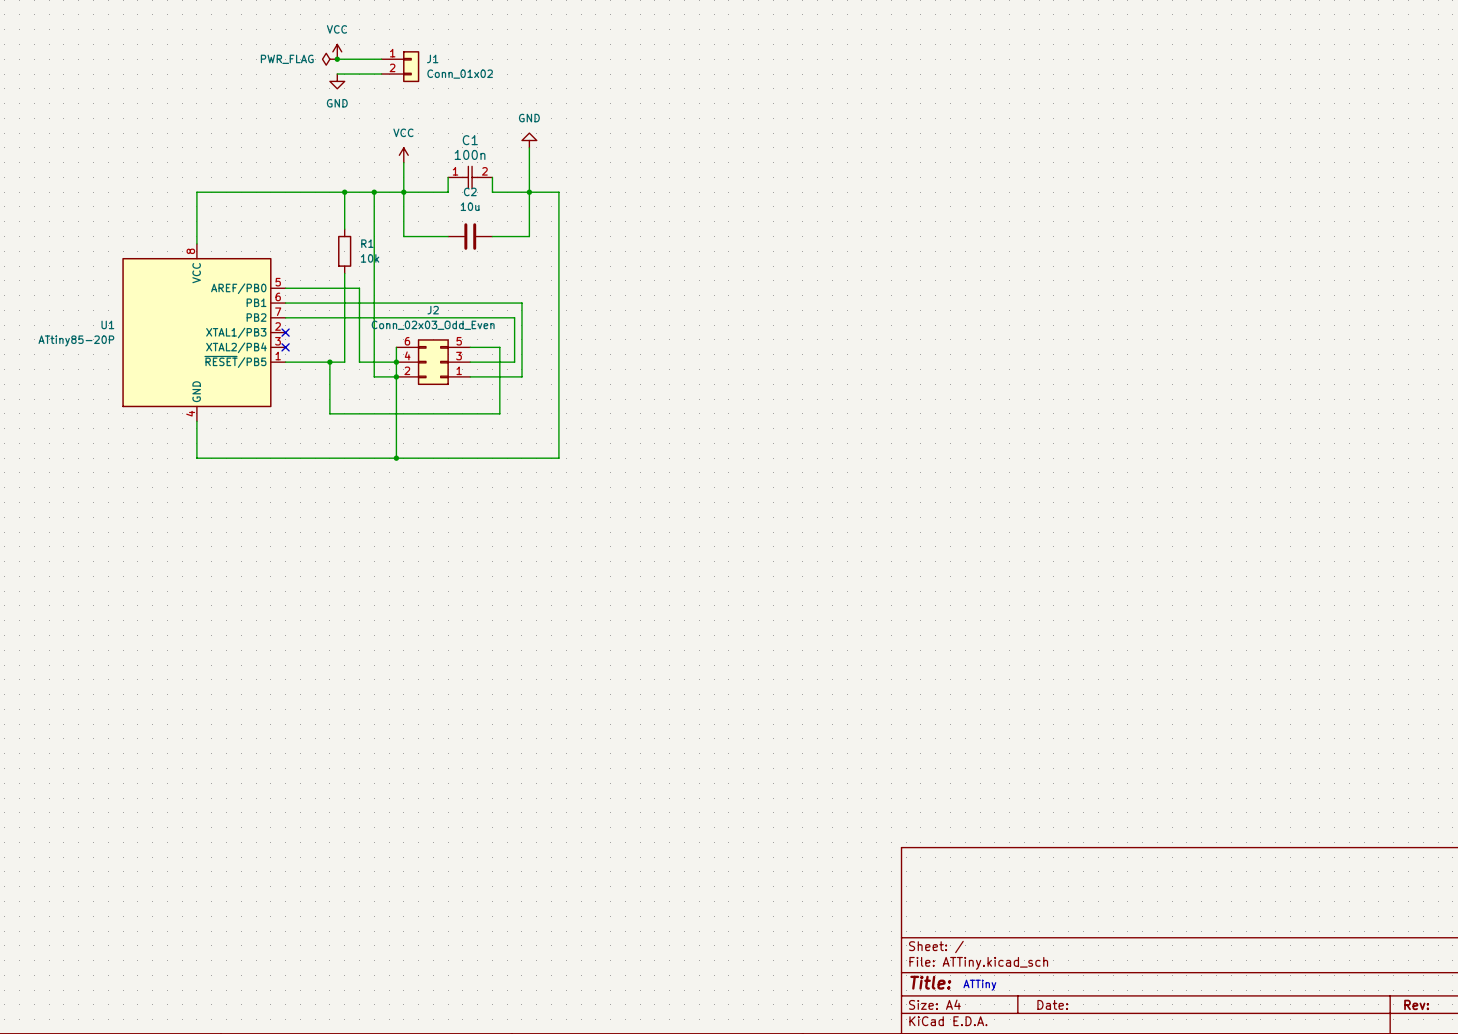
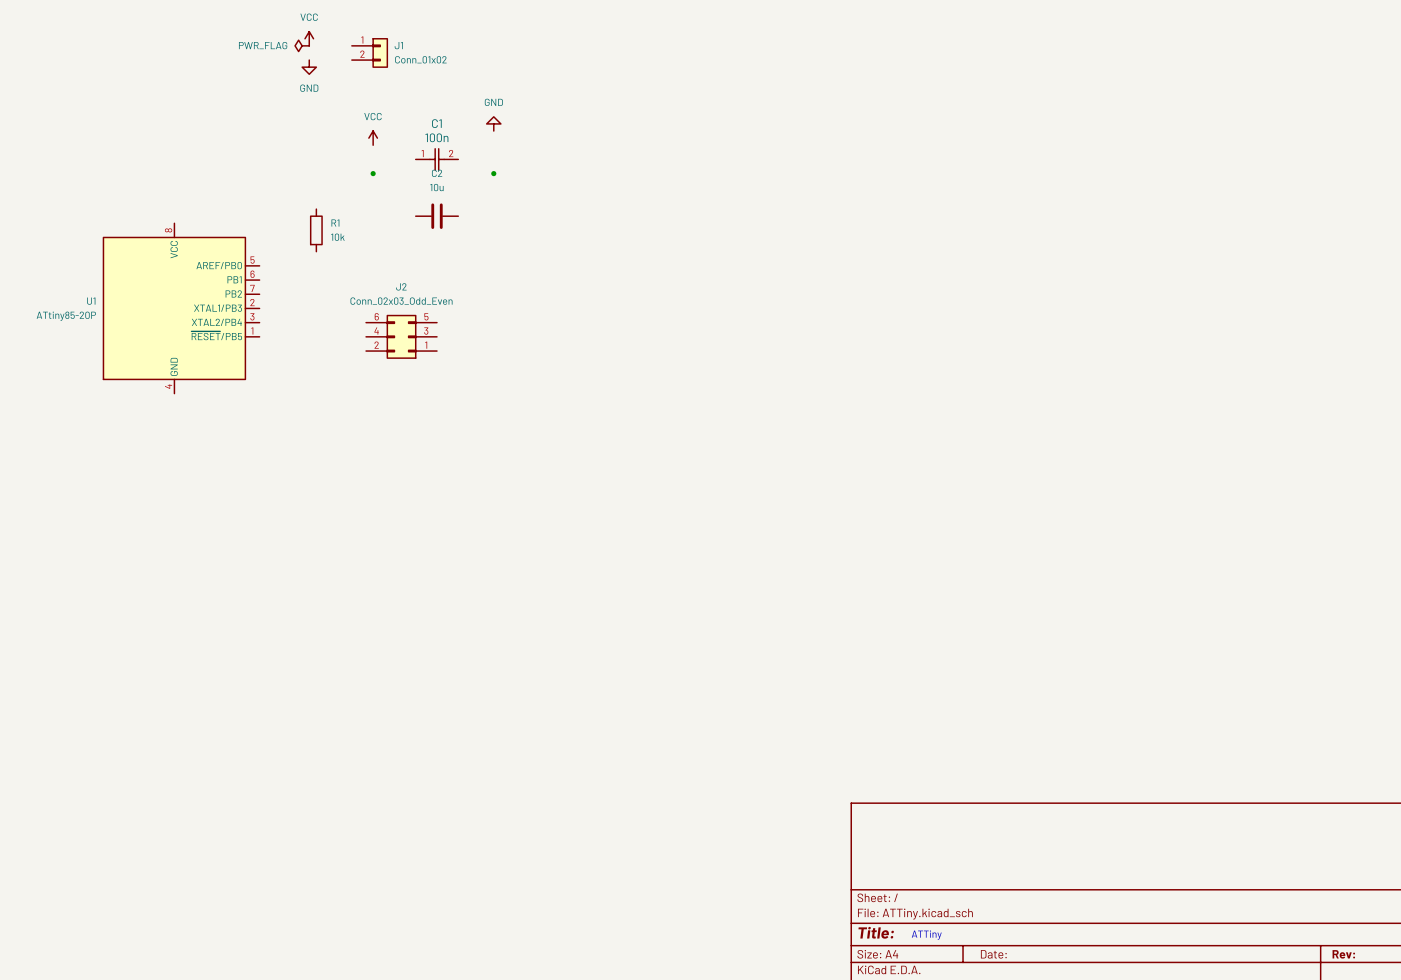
wire: (337, 59) (381, 59) -> none
junction: (337, 59) -> none
wire: (337, 74) (381, 74) -> none
wire: (529, 147) (529, 236) (492, 236) -> none
wire: (403, 162) (403, 236) (448, 236) -> none
wire: (448, 177) (448, 192) (196, 192) (196, 243) -> none
wire: (492, 177) (492, 192) (558, 192) (558, 458) (196, 458) (196, 421) -> none
wire: (344, 192) (344, 229) -> none
junction: (344, 192) -> none
wire: (374, 192) (374, 376) (396, 376) -> none
junction: (374, 192) -> none
wire: (344, 273) (344, 362) (285, 362) -> none
wire: (285, 288) (359, 288) (359, 362) (396, 362) -> none
wire: (285, 303) (521, 303) (521, 376) (470, 376) -> none
wire: (285, 317) (514, 317) (514, 362) (470, 362) -> none
no-connect mark: (285, 332) -> none
no-connect mark: (285, 347) -> none
wire: (396, 347) (396, 458) -> none
wire: (470, 347) (499, 347) (499, 413) (329, 413) (329, 362) -> none
junction: (329, 362) -> none
junction: (396, 362) -> none
junction: (396, 376) -> none
junction: (396, 458) -> none

